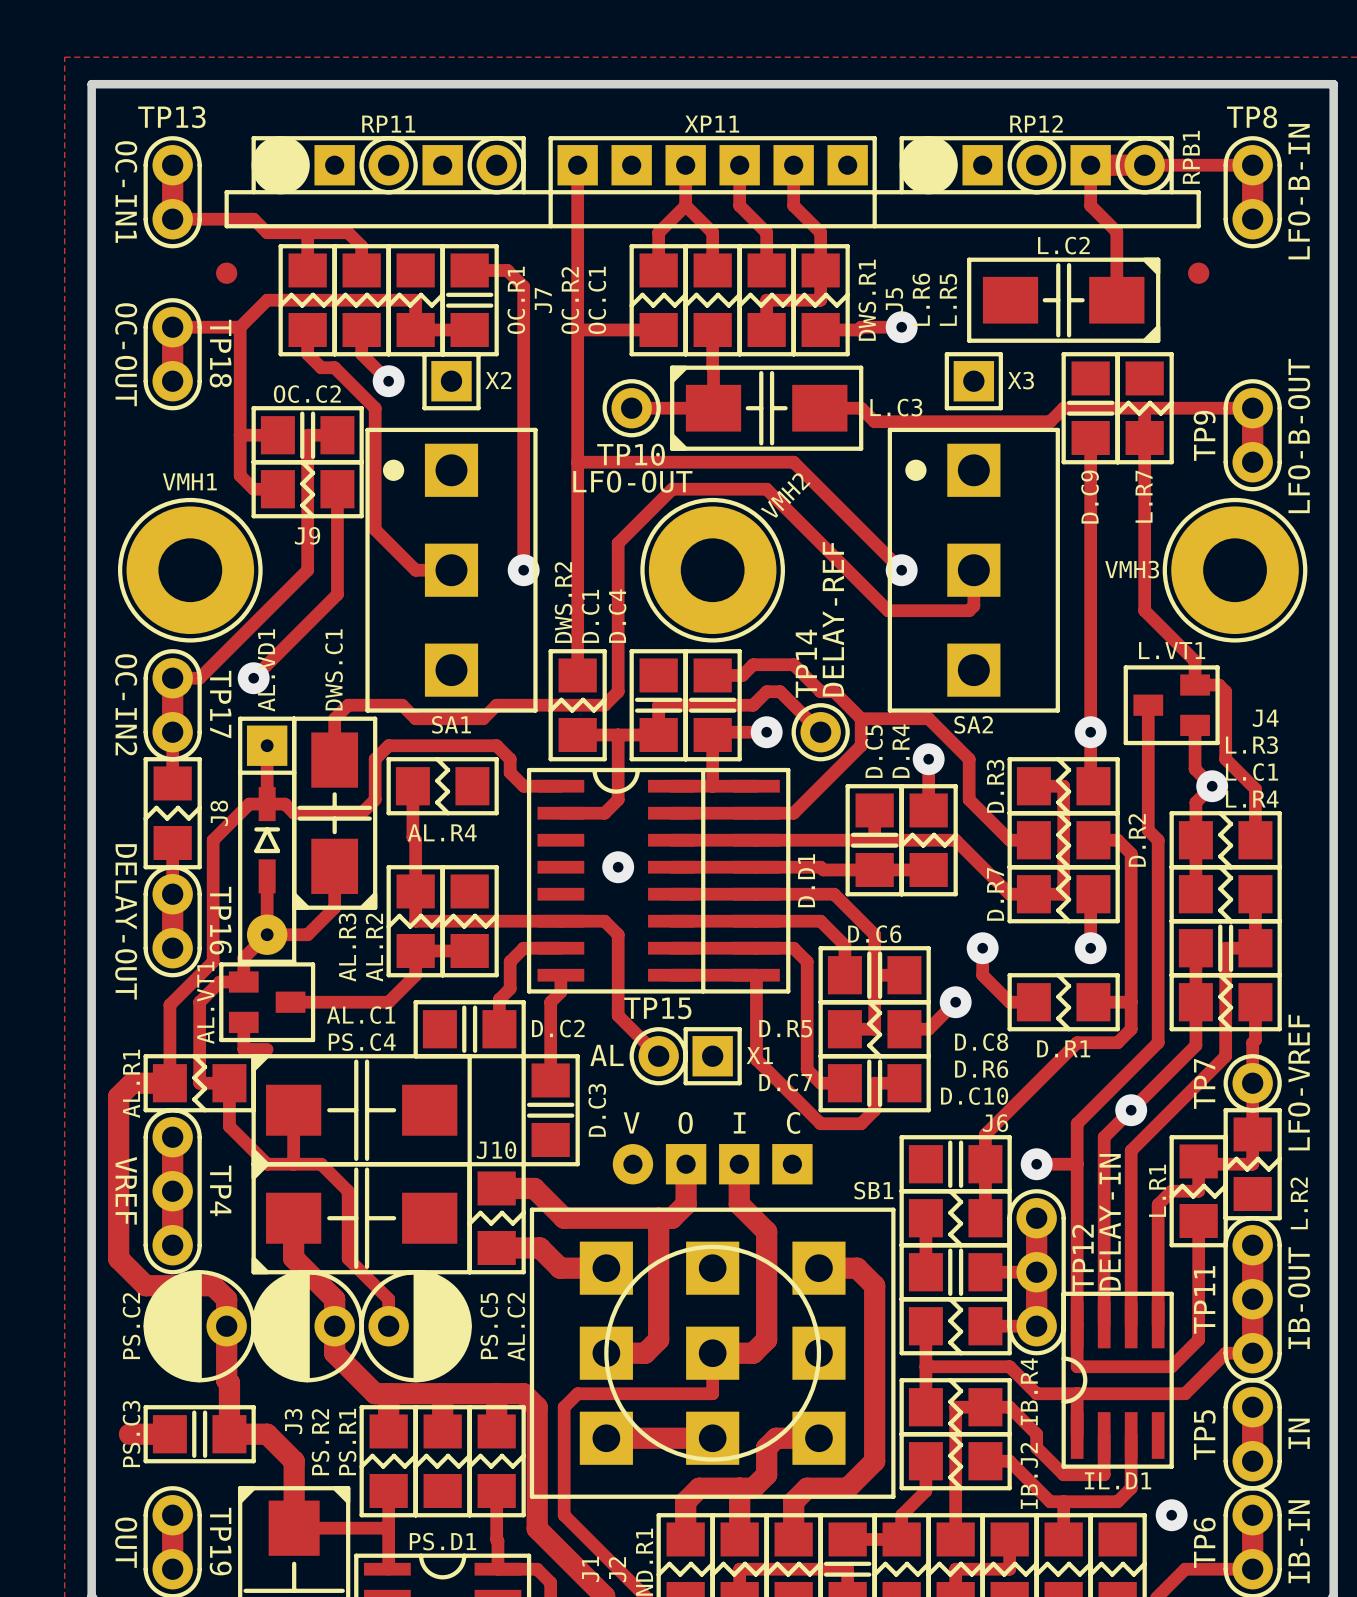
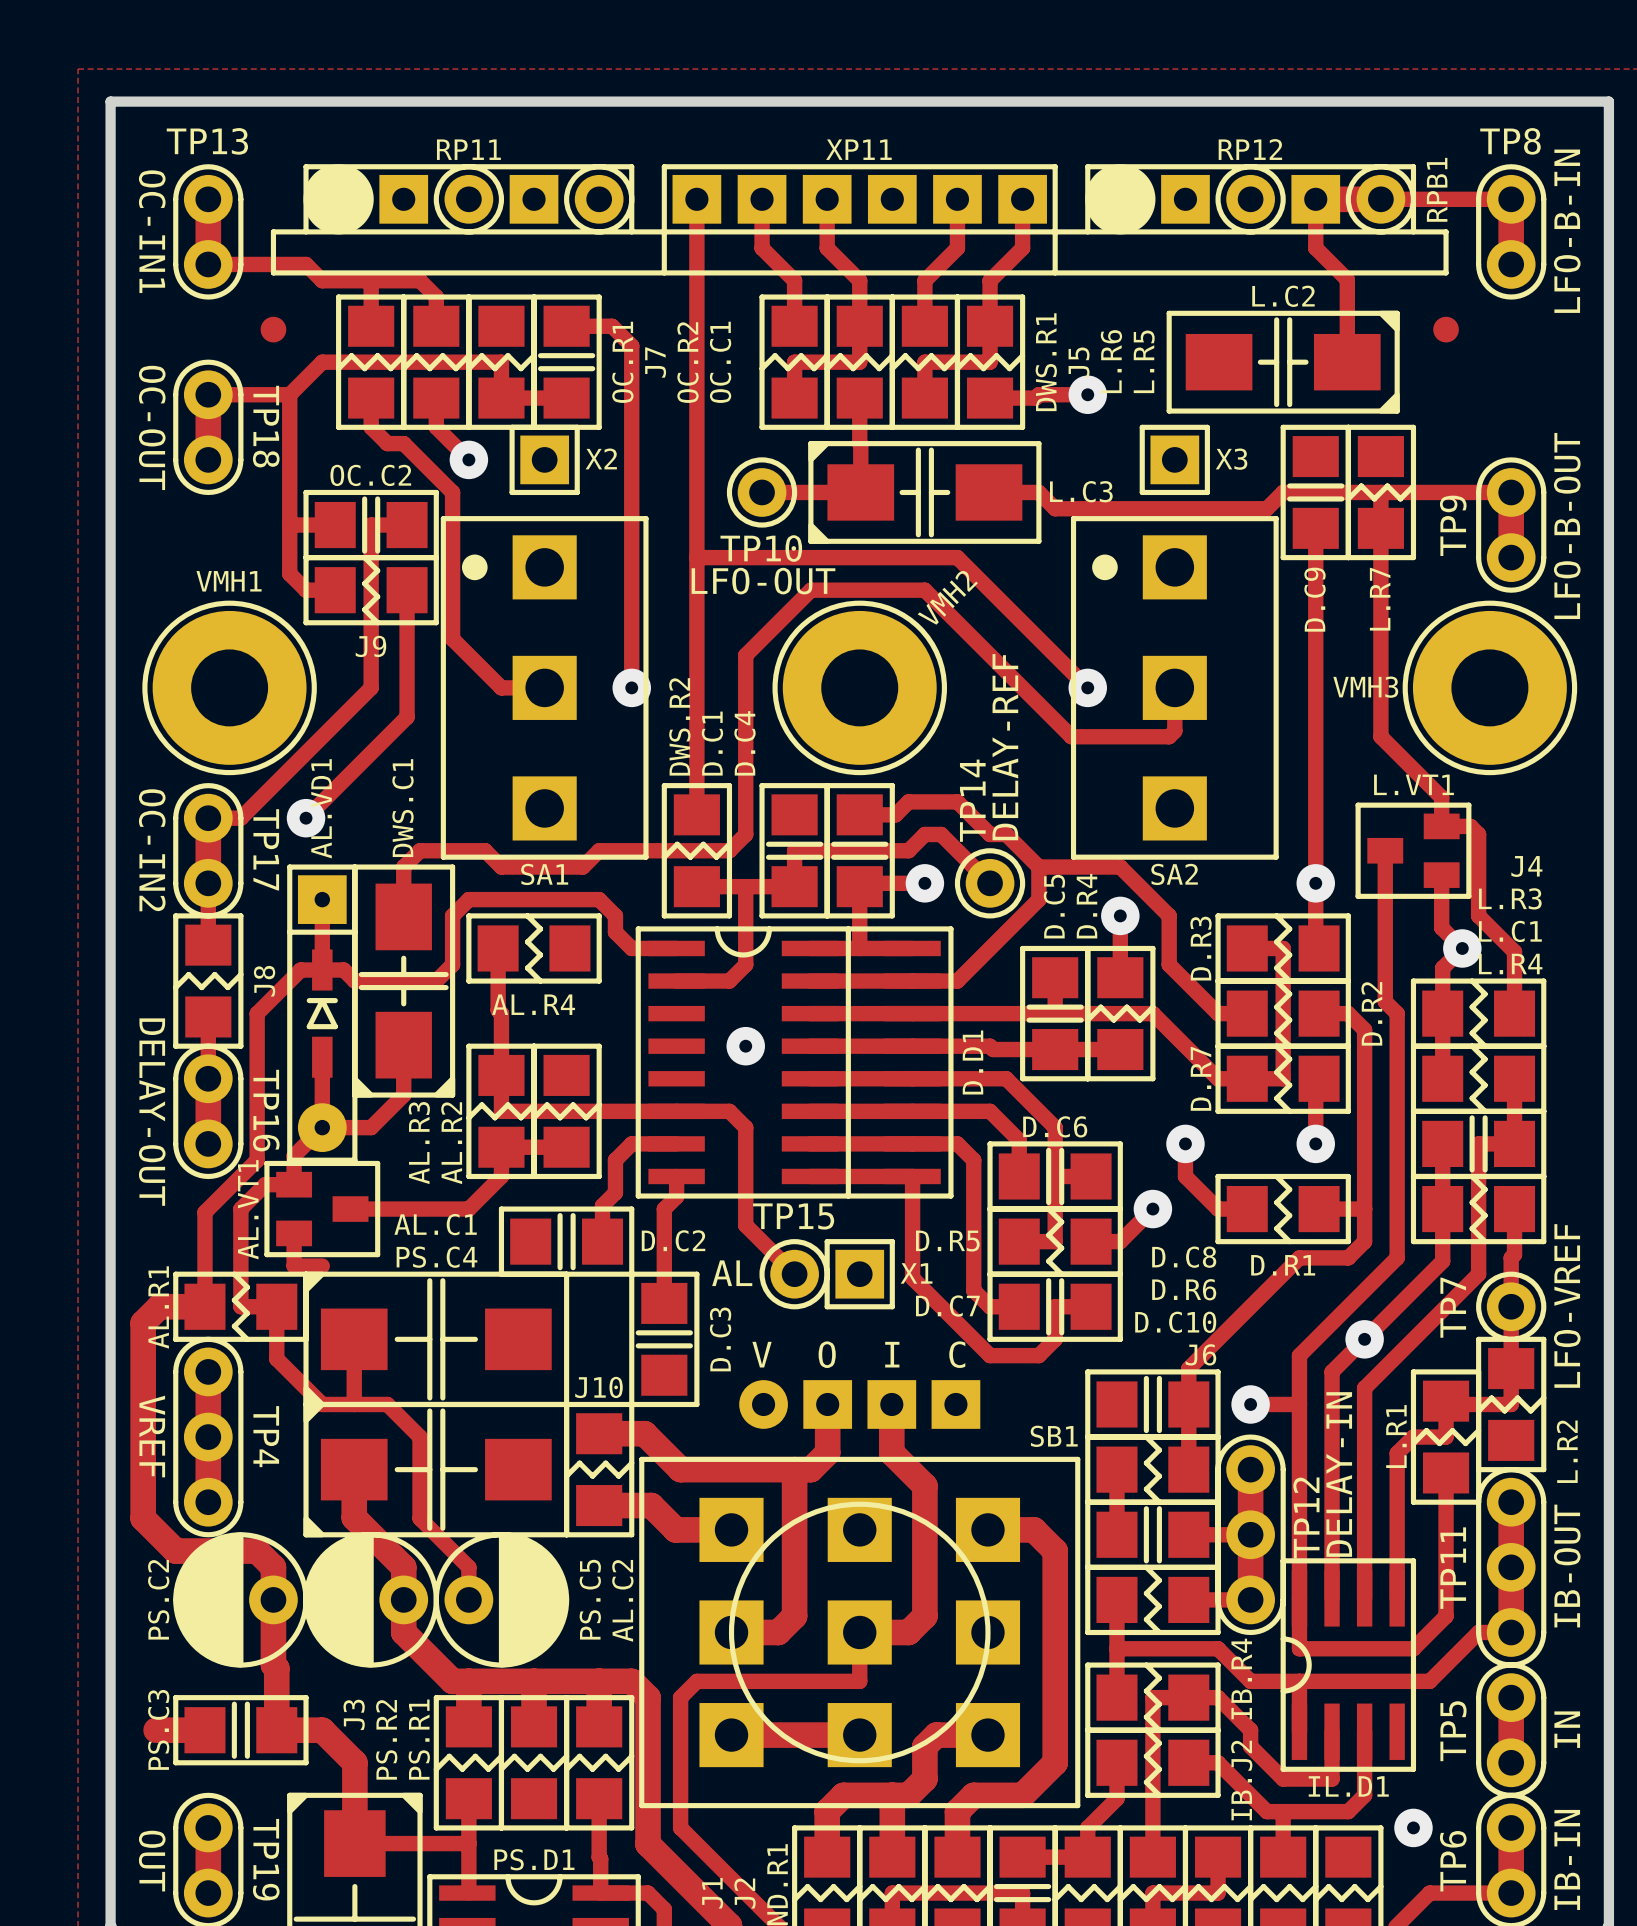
track: (739, 165) (739, 205) (766, 232) -> none
track: none -> (1022, 199) (1022, 248) (990, 280)
track: (685, 205) (658, 232) -> (762, 199) (762, 248) (794, 280)
track: (793, 205) (820, 232) -> (957, 248) (924, 280)
track: (577, 329) (658, 329) -> (859, 326) (859, 362) (794, 362) (794, 398)

